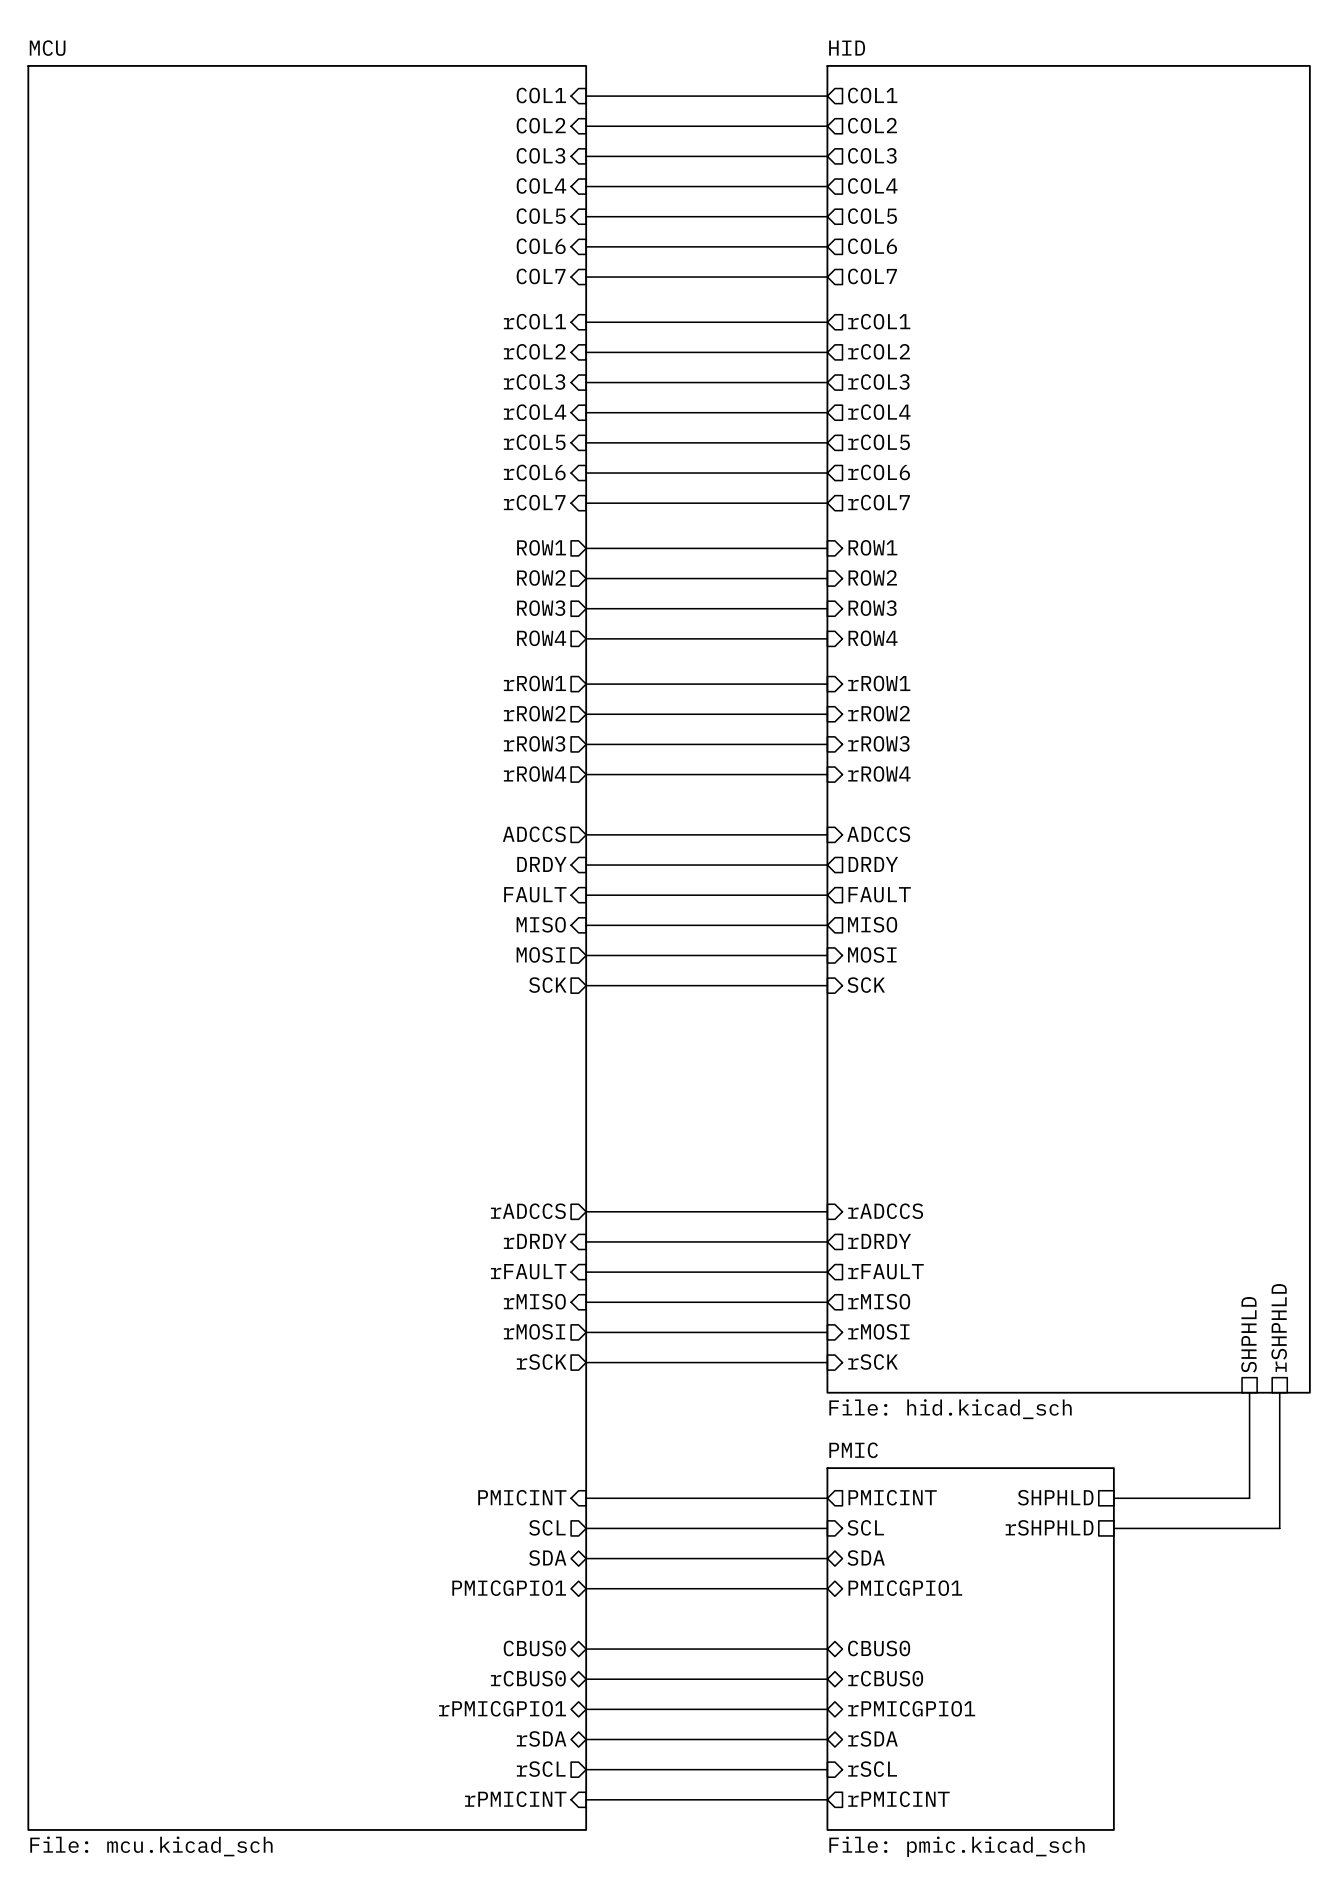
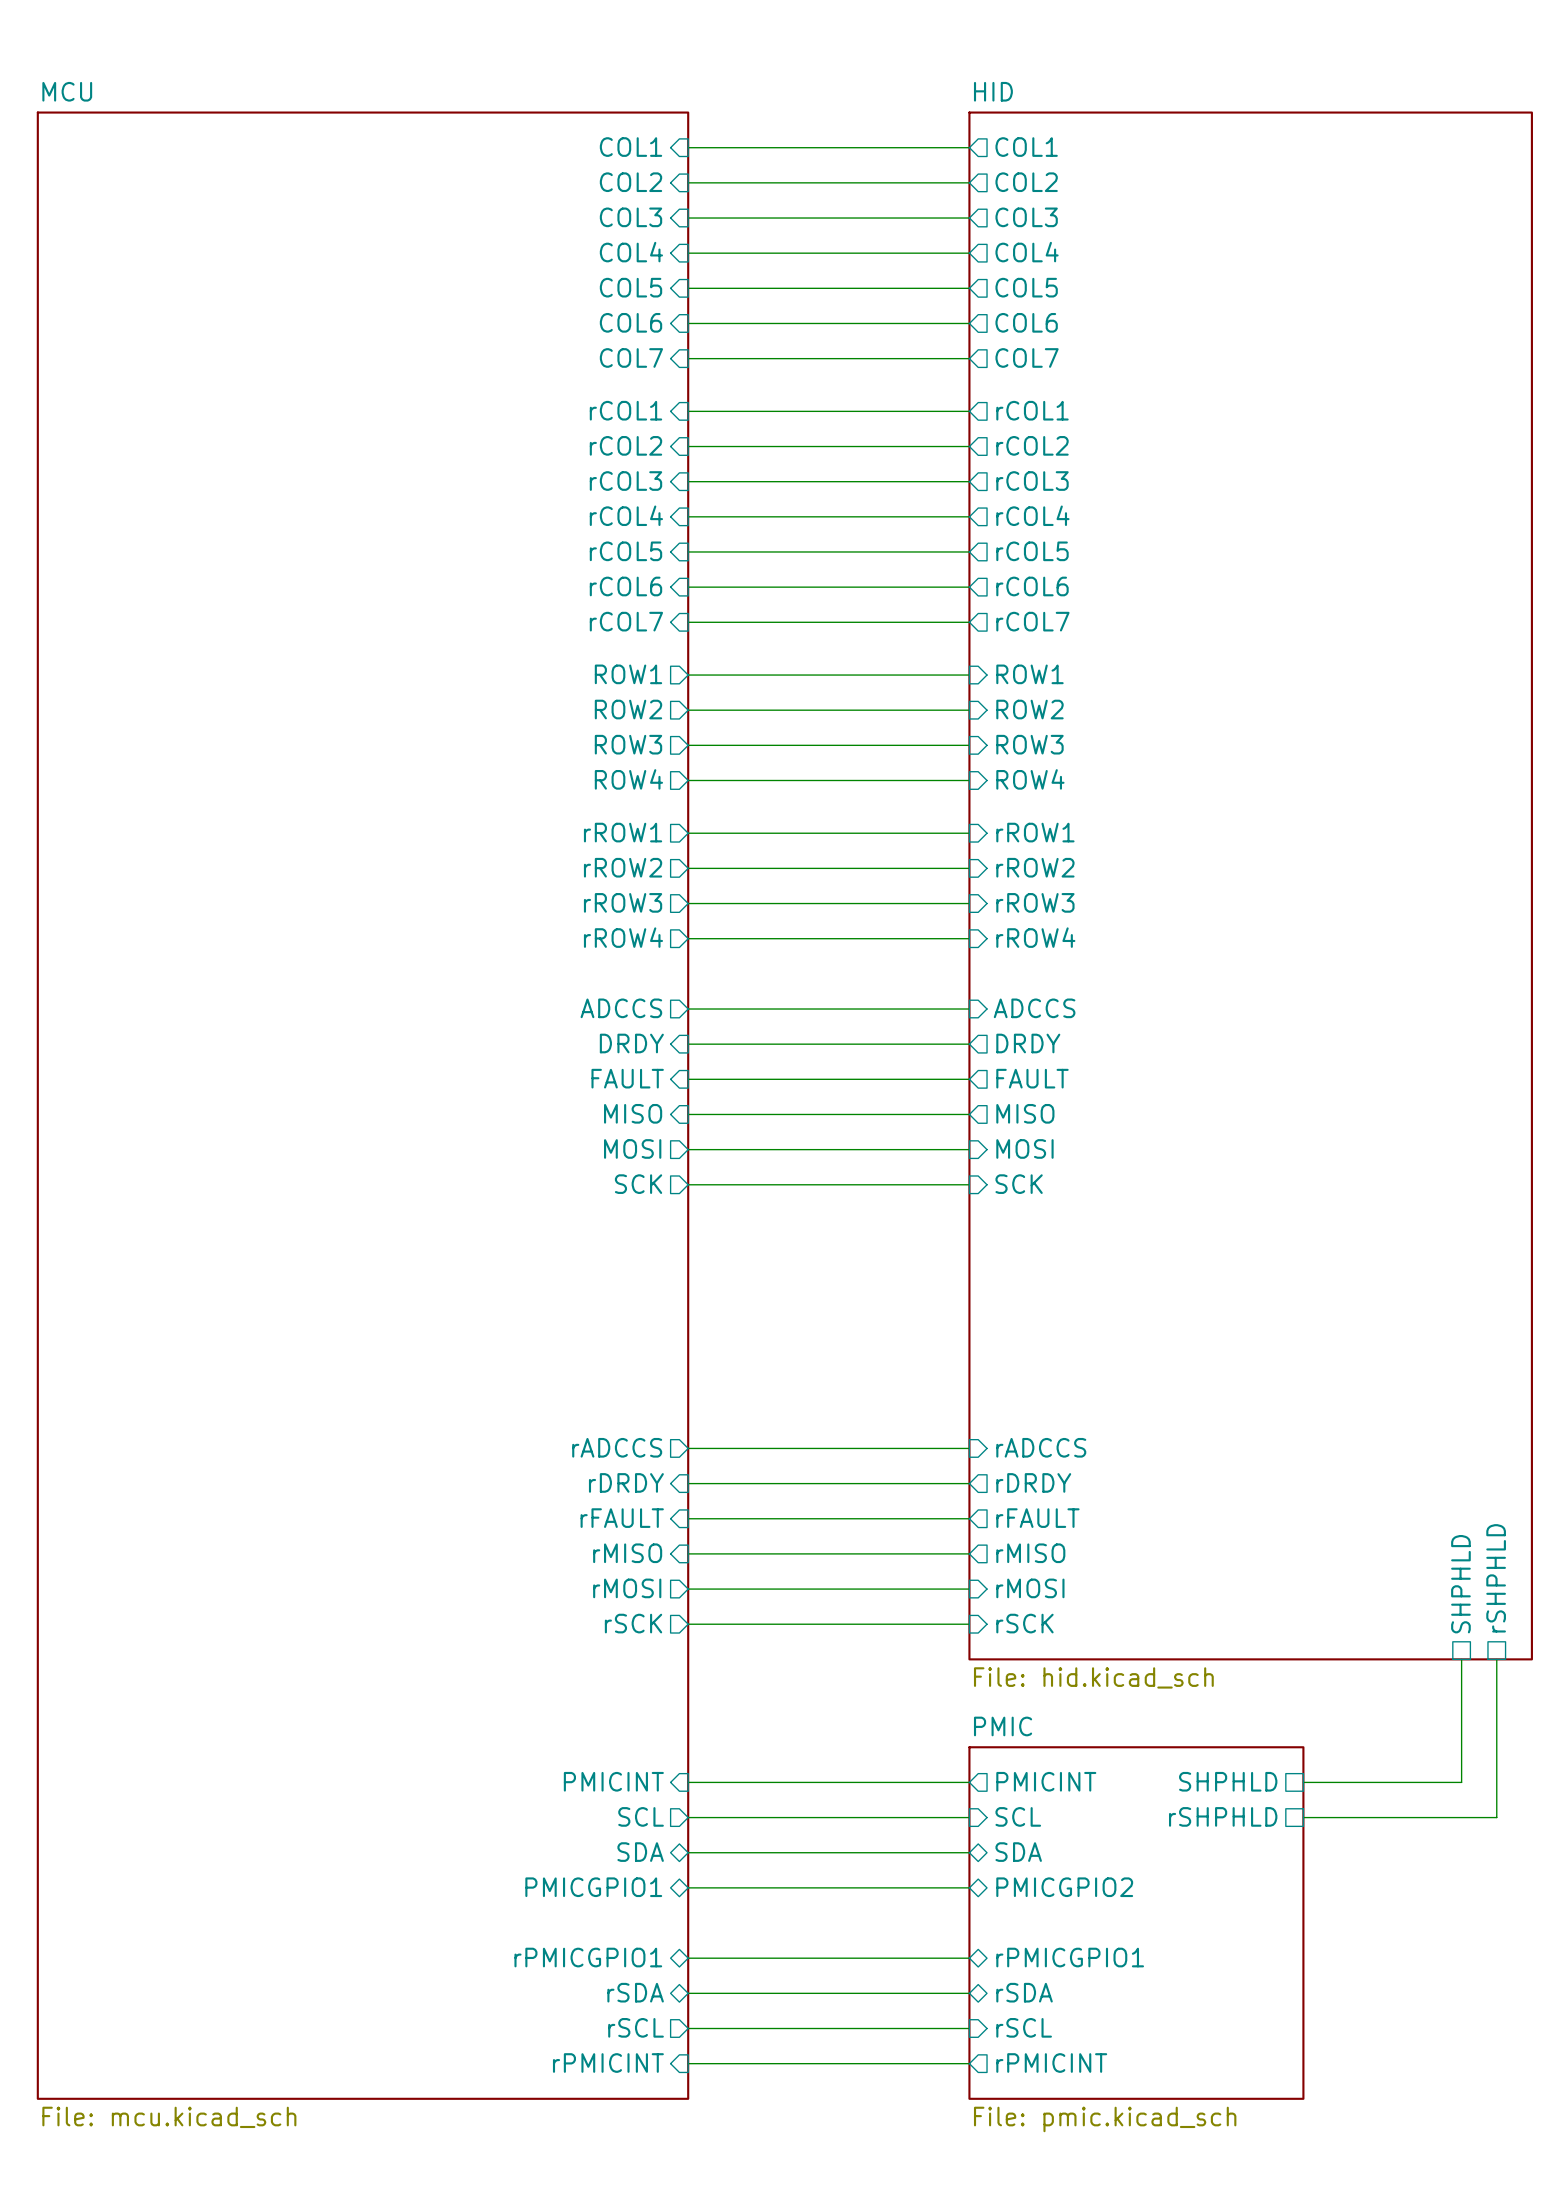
sheet MCU name position: MCU (47, 48) -> MCU (67, 91)
sheet MCU shape: [27, 65, 588, 1831] -> [36, 111, 690, 2100]
sheet pin: COL1 (541, 95) -> none
sheet pin: COL1 (872, 95) -> none
wire: (586, 96) (827, 96) -> none
sheet pin: COL2 (541, 125) -> COL1 (631, 147)
sheet pin: COL2 (872, 125) -> COL1 (1026, 147)
sheet pin: COL3 (540, 155) -> COL2 (631, 182)
sheet pin: COL3 (872, 155) -> COL2 (1026, 182)
sheet pin: COL4 (541, 185) -> COL3 (631, 217)
sheet pin: COL4 (872, 185) -> COL3 (1026, 217)
sheet pin: COL5 (541, 216) -> COL4 (631, 252)
sheet pin: COL5 (872, 216) -> COL4 (1027, 252)
sheet pin: COL6 (541, 246) -> COL5 (631, 287)
sheet pin: COL6 (872, 246) -> COL5 (1026, 287)
sheet pin: COL7 (541, 276) -> COL6 (631, 322)
sheet pin: COL7 (872, 276) -> COL6 (1026, 322)
sheet pin: rCOL1 (534, 321) -> COL7 (631, 357)
sheet pin: rCOL1 (879, 321) -> COL7 (1027, 357)
wire: (586, 322) (827, 322) -> (688, 358) (969, 358)
sheet pin: rCOL2 (534, 351) -> rCOL1 (625, 410)
sheet pin: rCOL2 (879, 351) -> rCOL1 (1032, 410)
sheet pin: rCOL3 (534, 381) -> rCOL2 (625, 445)
sheet pin: rCOL3 (878, 381) -> rCOL2 (1032, 445)
sheet pin: rCOL4 (535, 412) -> rCOL3 (625, 481)
sheet pin: rCOL4 (879, 412) -> rCOL3 (1032, 481)
sheet pin: rCOL5 (534, 442) -> rCOL4 (626, 515)
sheet pin: rCOL5 (879, 442) -> rCOL4 (1032, 515)
sheet pin: rCOL6 (534, 472) -> rCOL5 (625, 551)
sheet pin: rCOL6 (879, 472) -> rCOL5 (1032, 551)
sheet pin: rCOL7 (534, 502) -> rCOL6 (625, 586)
sheet pin: rCOL7 (879, 502) -> rCOL6 (1032, 586)
sheet pin: none -> rCOL7 (626, 621)
sheet pin: none -> rCOL7 (1032, 621)
sheet pin: ROW1 (541, 547) -> none
sheet pin: ROW1 (872, 547) -> none
wire: (586, 548) (827, 548) -> (688, 622) (969, 622)
sheet pin: ROW2 (541, 577) -> ROW1 (628, 674)
sheet pin: ROW2 (872, 577) -> ROW1 (1029, 674)
sheet pin: ROW3 (541, 608) -> ROW2 (628, 709)
sheet pin: ROW3 (872, 608) -> ROW2 (1029, 709)
sheet pin: ROW4 (541, 638) -> ROW3 (628, 744)
sheet pin: ROW4 (873, 638) -> ROW3 (1029, 744)
sheet pin: rROW1 (534, 683) -> ROW4 (628, 779)
sheet pin: rROW1 (879, 683) -> ROW4 (1030, 779)
wire: (586, 684) (827, 684) -> (688, 780) (969, 780)
sheet pin: rROW2 (534, 713) -> rROW1 (623, 832)
sheet pin: rROW2 (879, 713) -> rROW1 (1035, 832)
sheet HID position: (1068, 729) -> (1250, 885)
sheet pin: rROW3 (534, 743) -> rROW2 (623, 867)
sheet pin: rROW3 (878, 743) -> rROW2 (1035, 867)
sheet pin: rROW4 (535, 774) -> rROW3 (623, 902)
sheet pin: rROW4 (879, 774) -> rROW3 (1035, 902)
sheet pin: none -> rROW4 (623, 937)
sheet pin: none -> rROW4 (1035, 937)
sheet pin: ADCCS (534, 834) -> none
wire: (586, 834) (827, 834) -> (688, 938) (969, 938)
sheet pin: ADCCS (878, 834) -> none
sheet pin shape: input (541, 864) -> output (621, 1008)
sheet pin: DRDY (541, 864) -> ADCCS (621, 1008)
sheet pin shape: output (873, 864) -> input (1034, 1008)
sheet pin: DRDY (873, 864) -> ADCCS (1034, 1008)
sheet pin: FAULT (535, 894) -> DRDY (631, 1043)
sheet pin: FAULT (879, 894) -> DRDY (1028, 1043)
sheet pin: MISO (541, 924) -> FAULT (627, 1078)
sheet pin: MISO (872, 924) -> FAULT (1032, 1078)
sheet pin shape: output (540, 954) -> input (633, 1113)
sheet pin: MOSI (540, 954) -> MISO (633, 1113)
sheet pin shape: input (872, 954) -> output (1025, 1113)
sheet pin: MOSI (872, 954) -> MISO (1025, 1113)
sheet pin: SCK (547, 985) -> MOSI (632, 1148)
sheet pin: SCK (866, 985) -> MOSI (1024, 1148)
sheet pin: none -> SCK (638, 1184)
wire: none -> (688, 1184) (969, 1184)
sheet pin: none -> SCK (1019, 1184)
sheet pin: rADCCS (528, 1211) -> none
wire: (586, 1211) (827, 1211) -> (688, 1624) (969, 1624)
sheet pin: rADCCS (885, 1211) -> none
sheet pin shape: input (535, 1241) -> output (617, 1447)
sheet pin: rDRDY (535, 1241) -> rADCCS (617, 1447)
sheet pin shape: output (879, 1241) -> input (1041, 1447)
sheet pin: rDRDY (879, 1241) -> rADCCS (1041, 1447)
sheet pin: rFAULT (528, 1271) -> rDRDY (626, 1482)
sheet pin: rFAULT (886, 1271) -> rDRDY (1033, 1482)
sheet pin: rMISO (534, 1301) -> rFAULT (622, 1518)
sheet pin: rMISO (879, 1301) -> rFAULT (1037, 1518)
sheet pin position: rSHPHLD (1279, 1327) -> rSHPHLD (1496, 1578)
sheet pin shape: output (534, 1331) -> input (627, 1553)
sheet pin: rMOSI (534, 1331) -> rMISO (627, 1553)
sheet pin shape: input (878, 1331) -> output (1030, 1553)
sheet pin: rMOSI (878, 1331) -> rMISO (1030, 1553)
sheet pin position: SHPHLD (1249, 1334) -> SHPHLD (1460, 1584)
sheet pin: rSCK (541, 1362) -> rMOSI (627, 1588)
sheet pin: rSCK (873, 1362) -> rMOSI (1030, 1588)
sheet pin: none -> rSCK (633, 1623)
sheet pin: none -> rSCK (1024, 1623)
wire: (1249, 1392) (1249, 1422) -> none
wire: (1279, 1392) (1279, 1422) -> none
sheet PMIC name position: PMIC (853, 1450) -> PMIC (1003, 1726)
sheet PMIC shape: [826, 1467, 1115, 1831] -> [968, 1746, 1305, 2100]
sheet pin: PMICINT (522, 1497) -> none
sheet pin: PMICINT (892, 1497) -> none
sheet pin: SHPHLD (1055, 1497) -> none
wire: (586, 1498) (827, 1498) -> (688, 1887) (969, 1887)
wire: (1113, 1498) (1249, 1498) -> none
sheet pin shape: output (547, 1527) -> input (613, 1781)
sheet pin: SCL (547, 1527) -> PMICINT (613, 1781)
sheet pin shape: input (865, 1527) -> output (1046, 1781)
sheet pin: SCL (865, 1527) -> PMICINT (1046, 1781)
sheet pin: rSHPHLD (1049, 1527) -> SHPHLD (1228, 1781)
wire: (1249, 1528) (1279, 1528) -> (1461, 1782) (1461, 1747)
wire: none -> (1496, 1782) (1496, 1817) (1303, 1817)
sheet pin shape: bidirectional (547, 1558) -> output (641, 1816)
sheet pin: SDA (547, 1558) -> SCL (641, 1816)
sheet pin shape: bidirectional (866, 1558) -> input (1018, 1816)
sheet pin: SDA (866, 1558) -> SCL (1018, 1816)
sheet pin: none -> rSHPHLD (1223, 1816)
sheet pin: PMICGPIO1 (509, 1588) -> SDA (640, 1852)
sheet pin: PMICGPIO1 (905, 1588) -> SDA (1018, 1852)
sheet pin: none -> PMICGPIO1 (593, 1887)
sheet pin: none -> PMICGPIO2 (1064, 1887)
sheet pin: CBUS0 (534, 1648) -> none
sheet pin: CBUS0 (879, 1648) -> none
wire: (586, 1649) (827, 1649) -> none
sheet pin: rCBUS0 (528, 1678) -> rPMICGPIO1 (588, 1957)
sheet pin: rCBUS0 (885, 1678) -> rPMICGPIO1 (1070, 1957)
sheet pin: rPMICGPIO1 (502, 1708) -> rSDA (635, 1992)
sheet pin: rPMICGPIO1 (911, 1708) -> rSDA (1024, 1992)
sheet pin shape: bidirectional (541, 1738) -> output (636, 2027)
sheet pin: rSDA (541, 1738) -> rSCL (636, 2027)
sheet pin shape: bidirectional (872, 1738) -> input (1024, 2027)
sheet pin: rSDA (872, 1738) -> rSCL (1024, 2027)
sheet pin shape: output (541, 1769) -> input (608, 2063)
sheet pin: rSCL (541, 1769) -> rPMICINT (608, 2063)
sheet pin shape: input (872, 1769) -> output (1051, 2063)
sheet pin: rSCL (872, 1769) -> rPMICINT (1051, 2063)
sheet pin: rPMICINT (515, 1799) -> none
wire: (586, 1799) (827, 1799) -> none
sheet pin: rPMICINT (898, 1799) -> none
sheet MCU value position: File: mcu.kicad_sch (151, 1846) -> File: mcu.kicad_sch (169, 2117)
sheet PMIC value position: File: pmic.kicad_sch (956, 1846) -> File: pmic.kicad_sch (1105, 2119)

